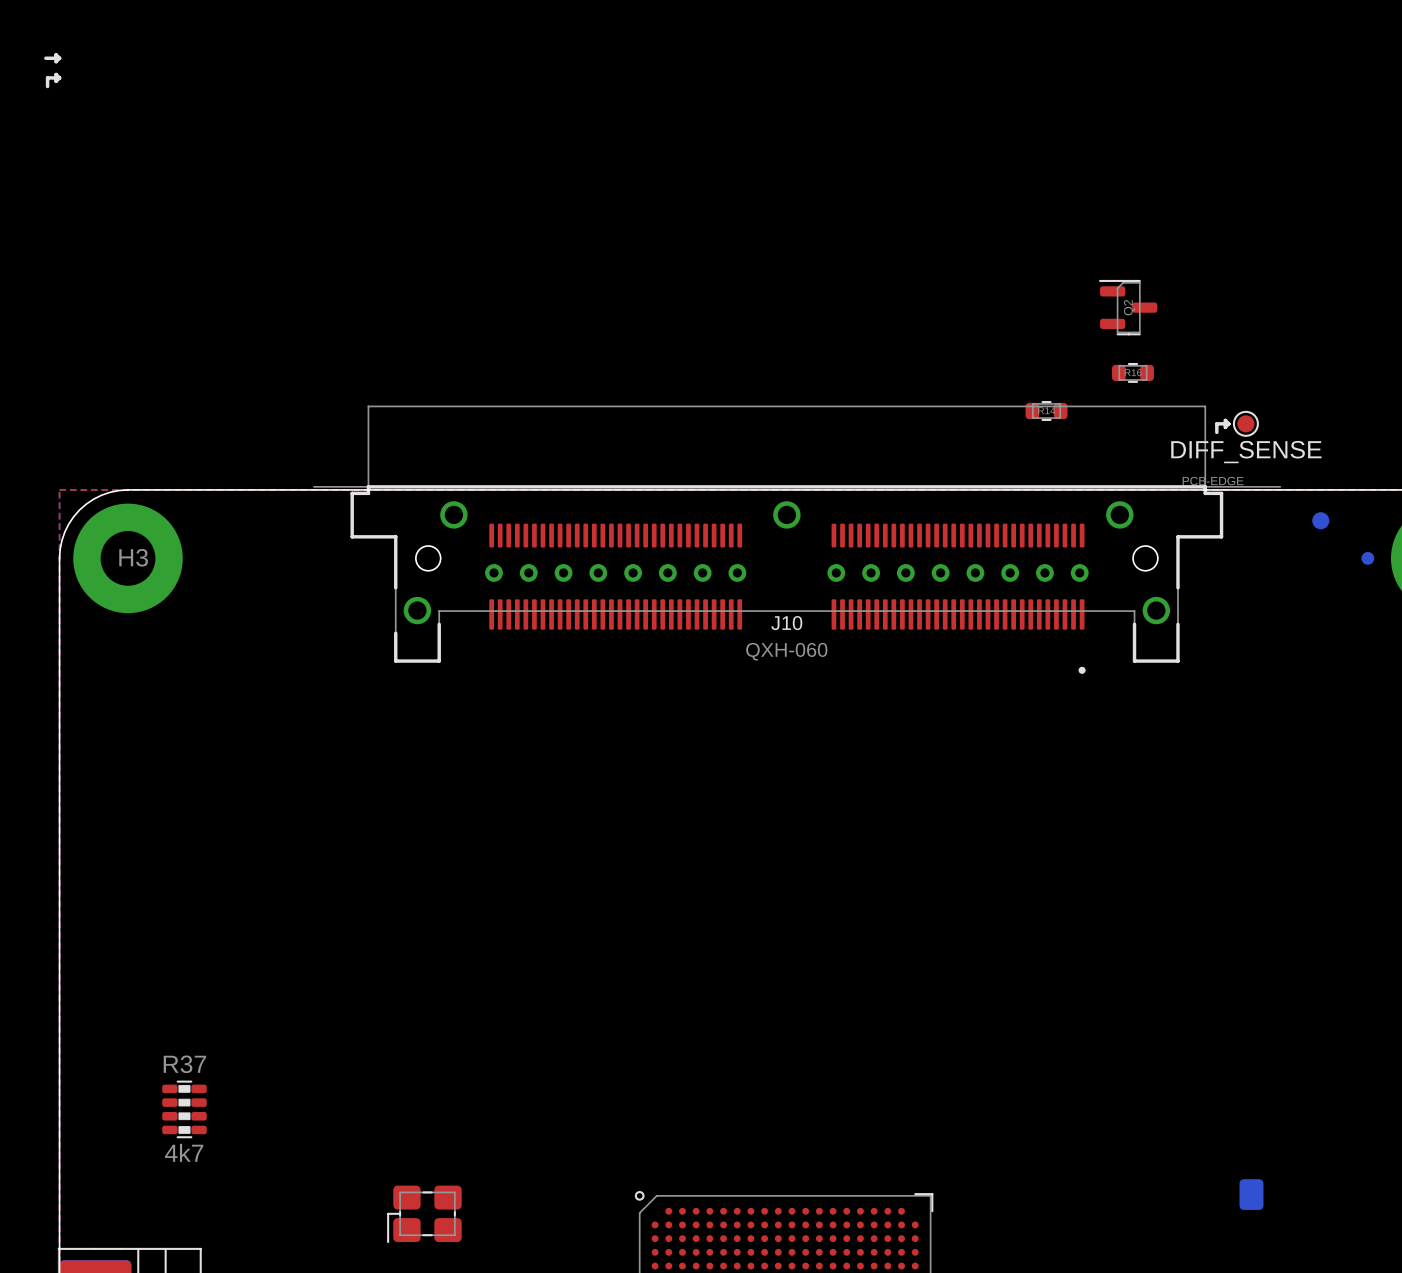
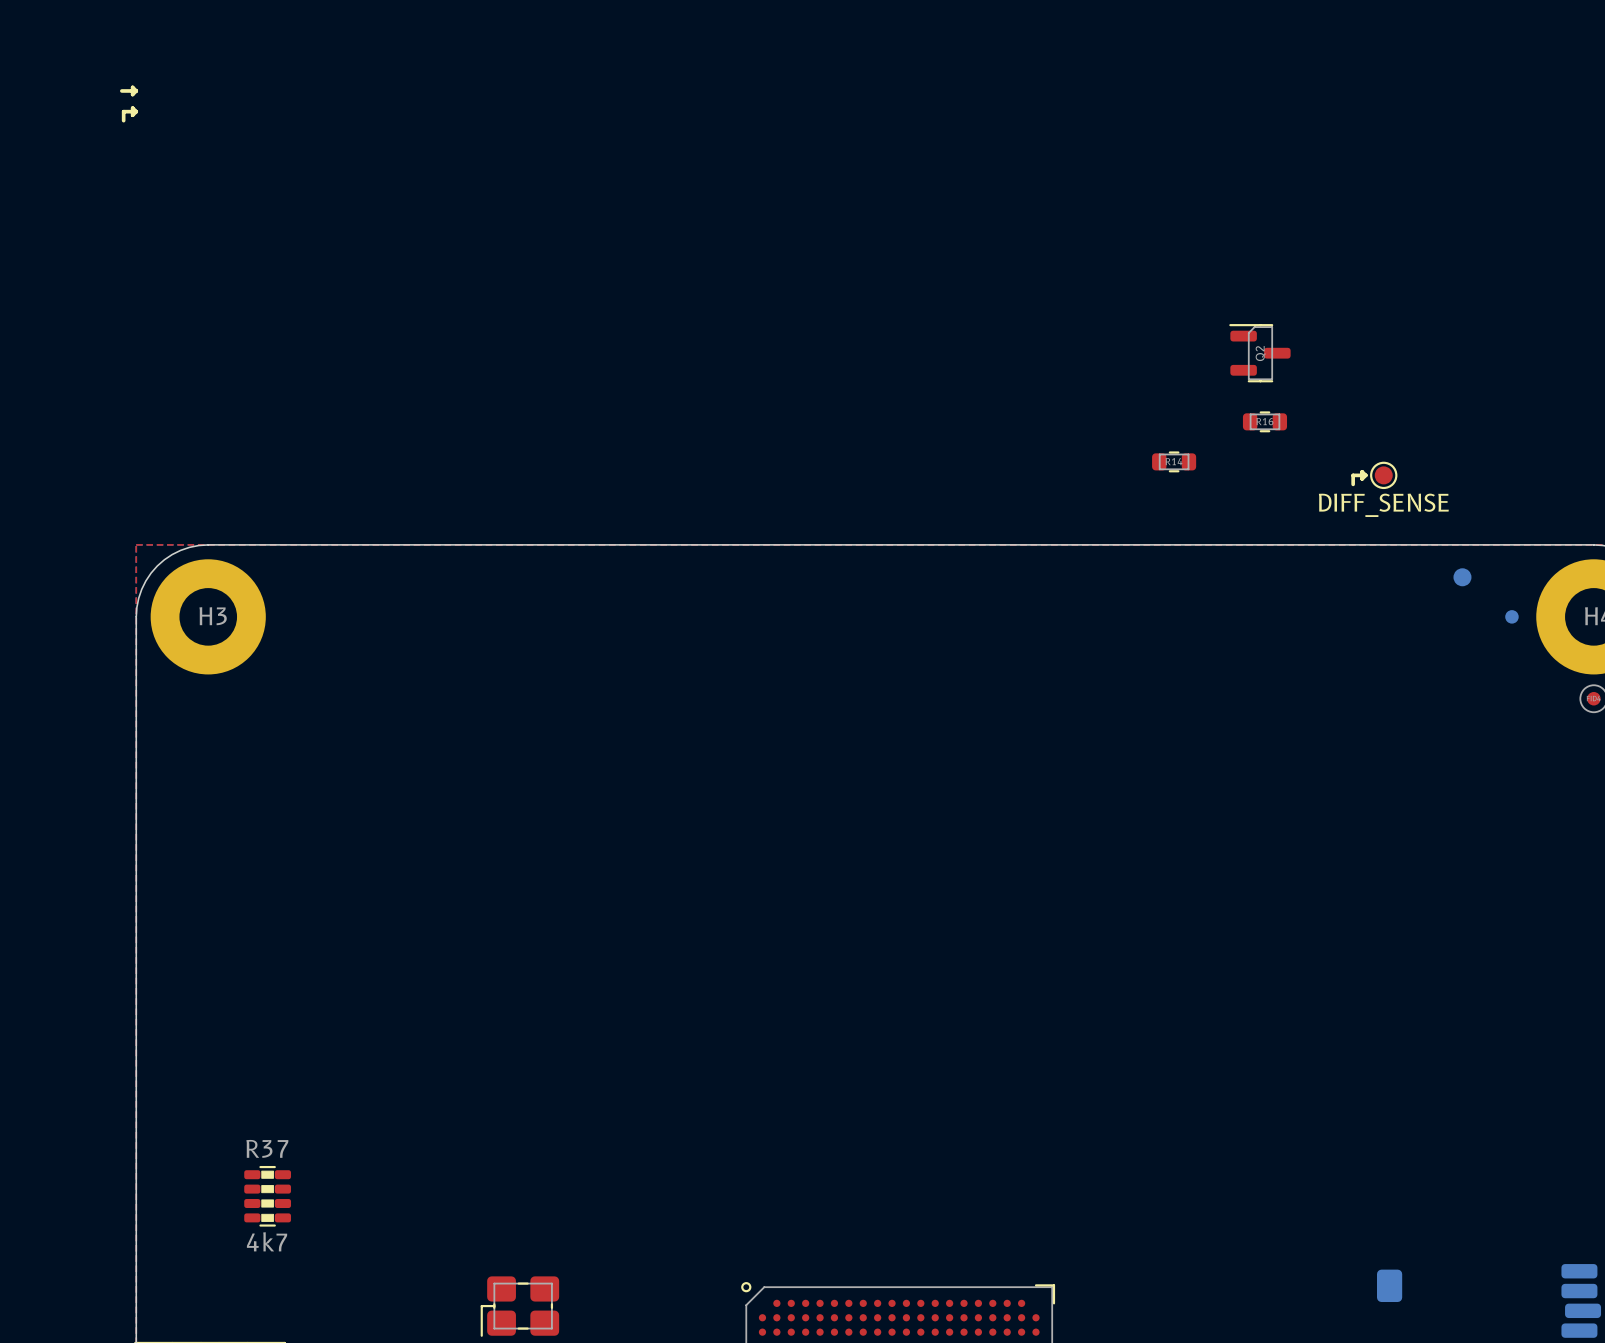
J10: QXH-060 (797, 539) -> none

